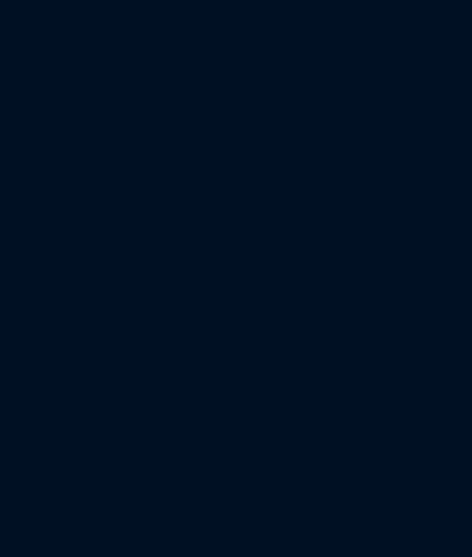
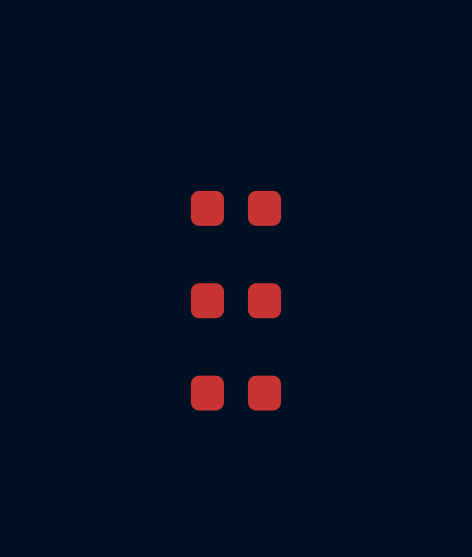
part: none -> (235, 208)
part: none -> (235, 300)
part: none -> (235, 393)

